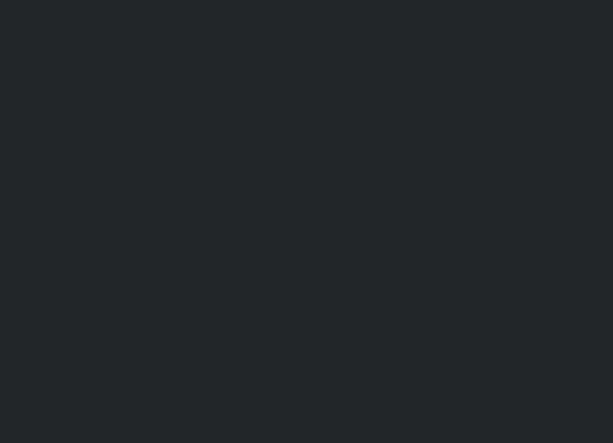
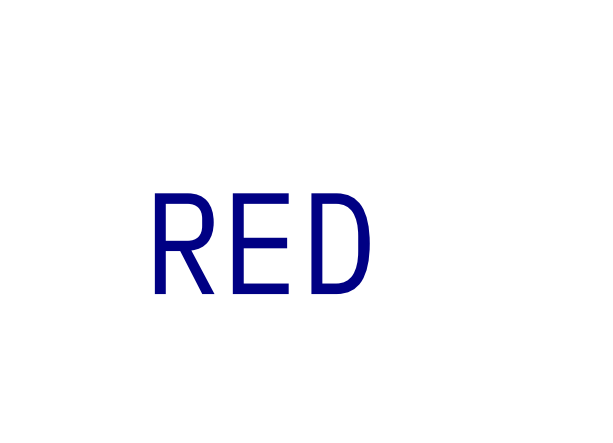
text: none -> RED (262, 243)

